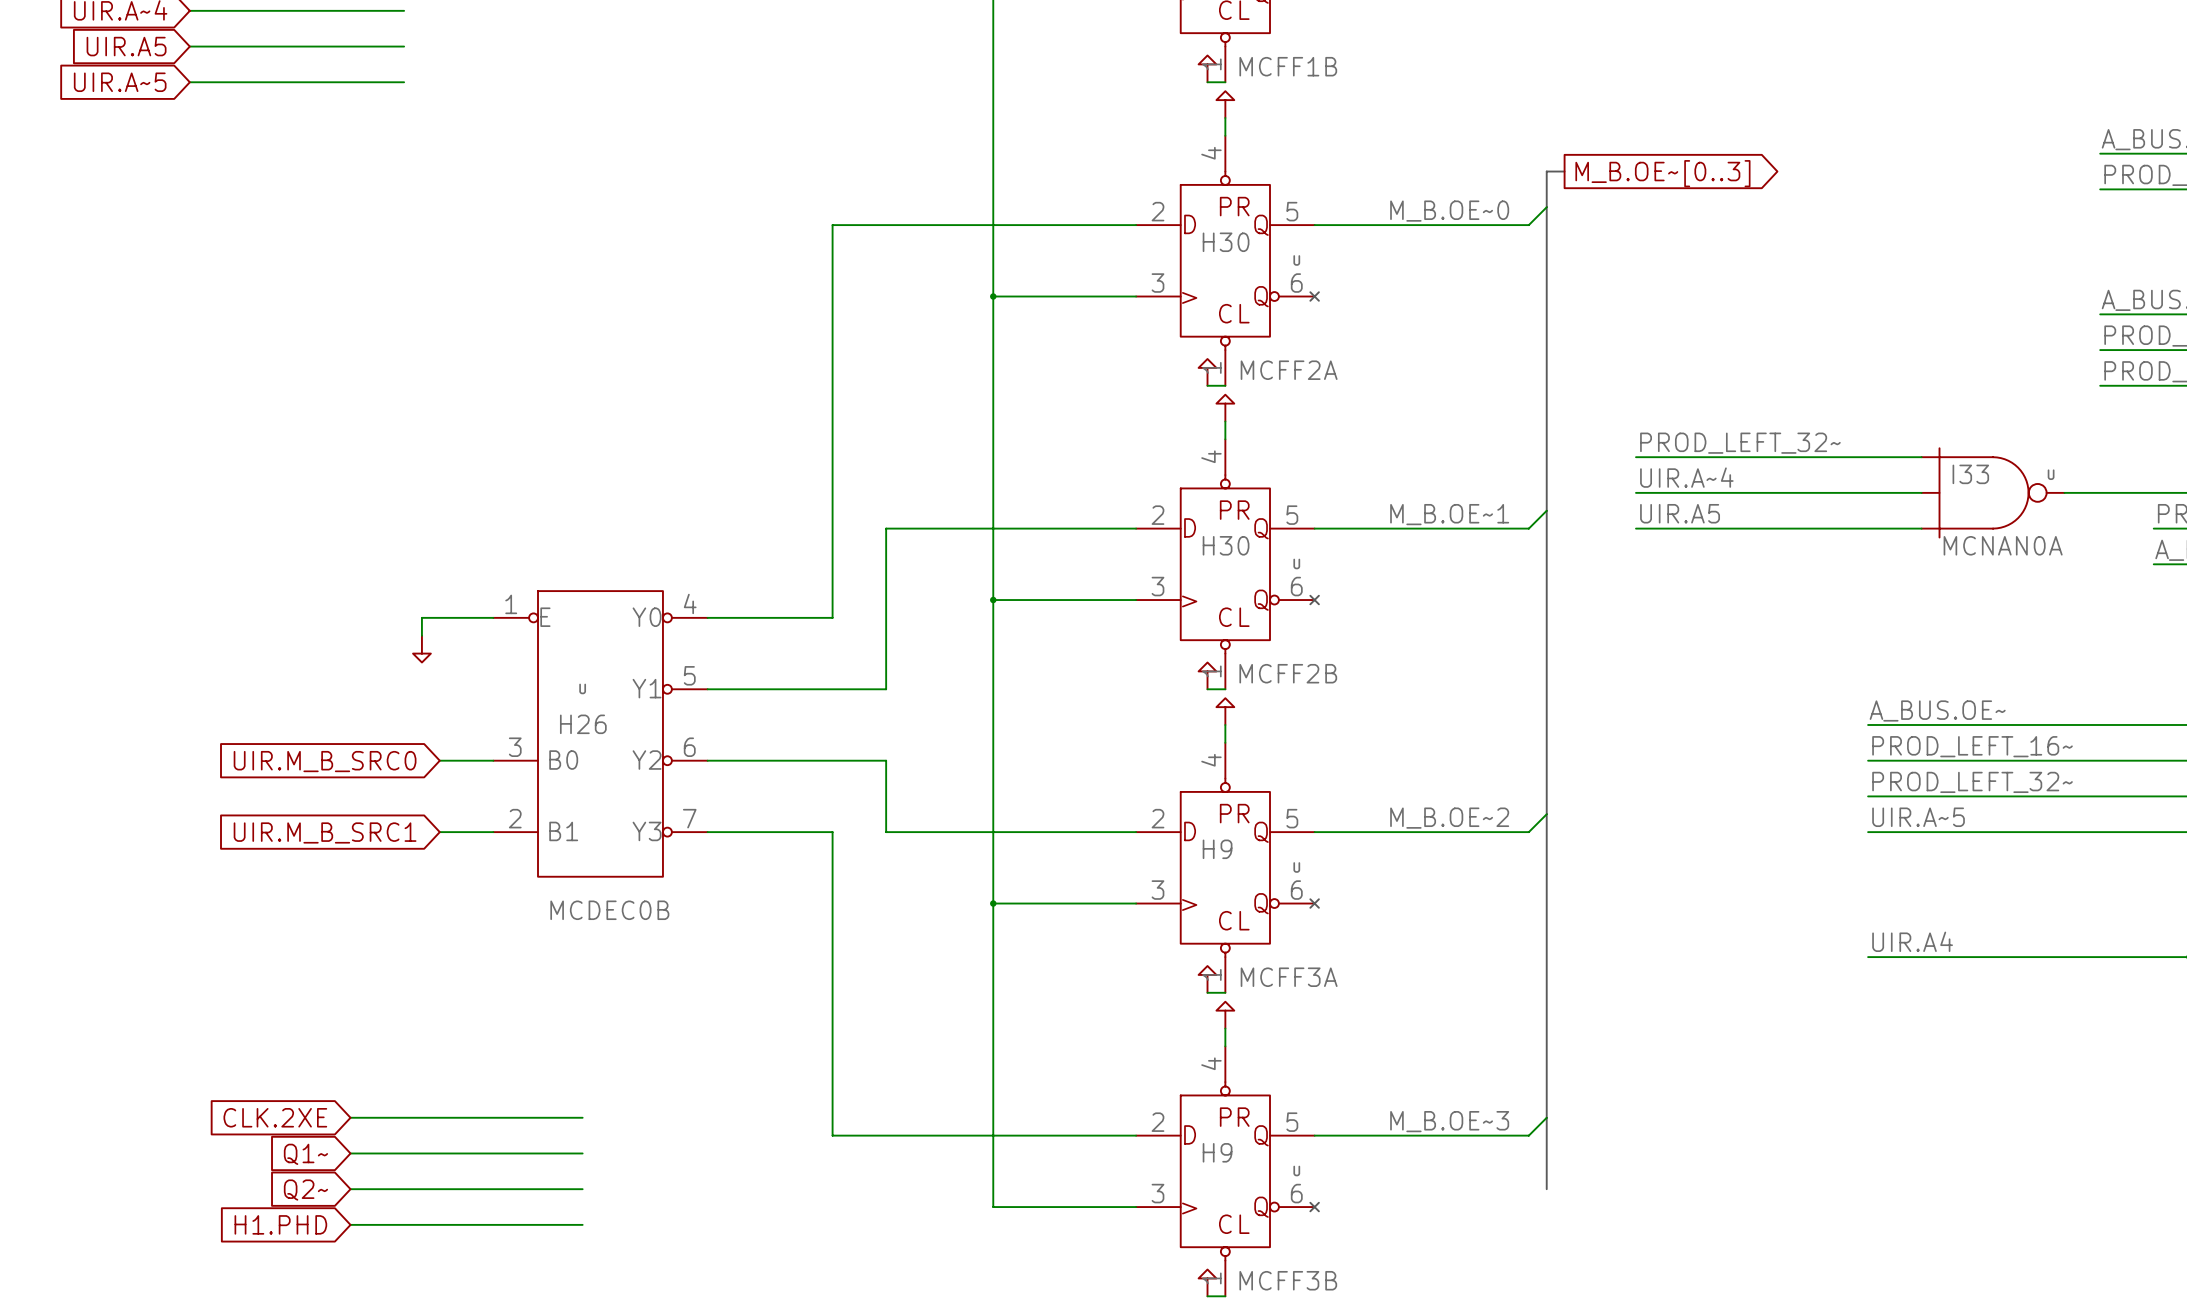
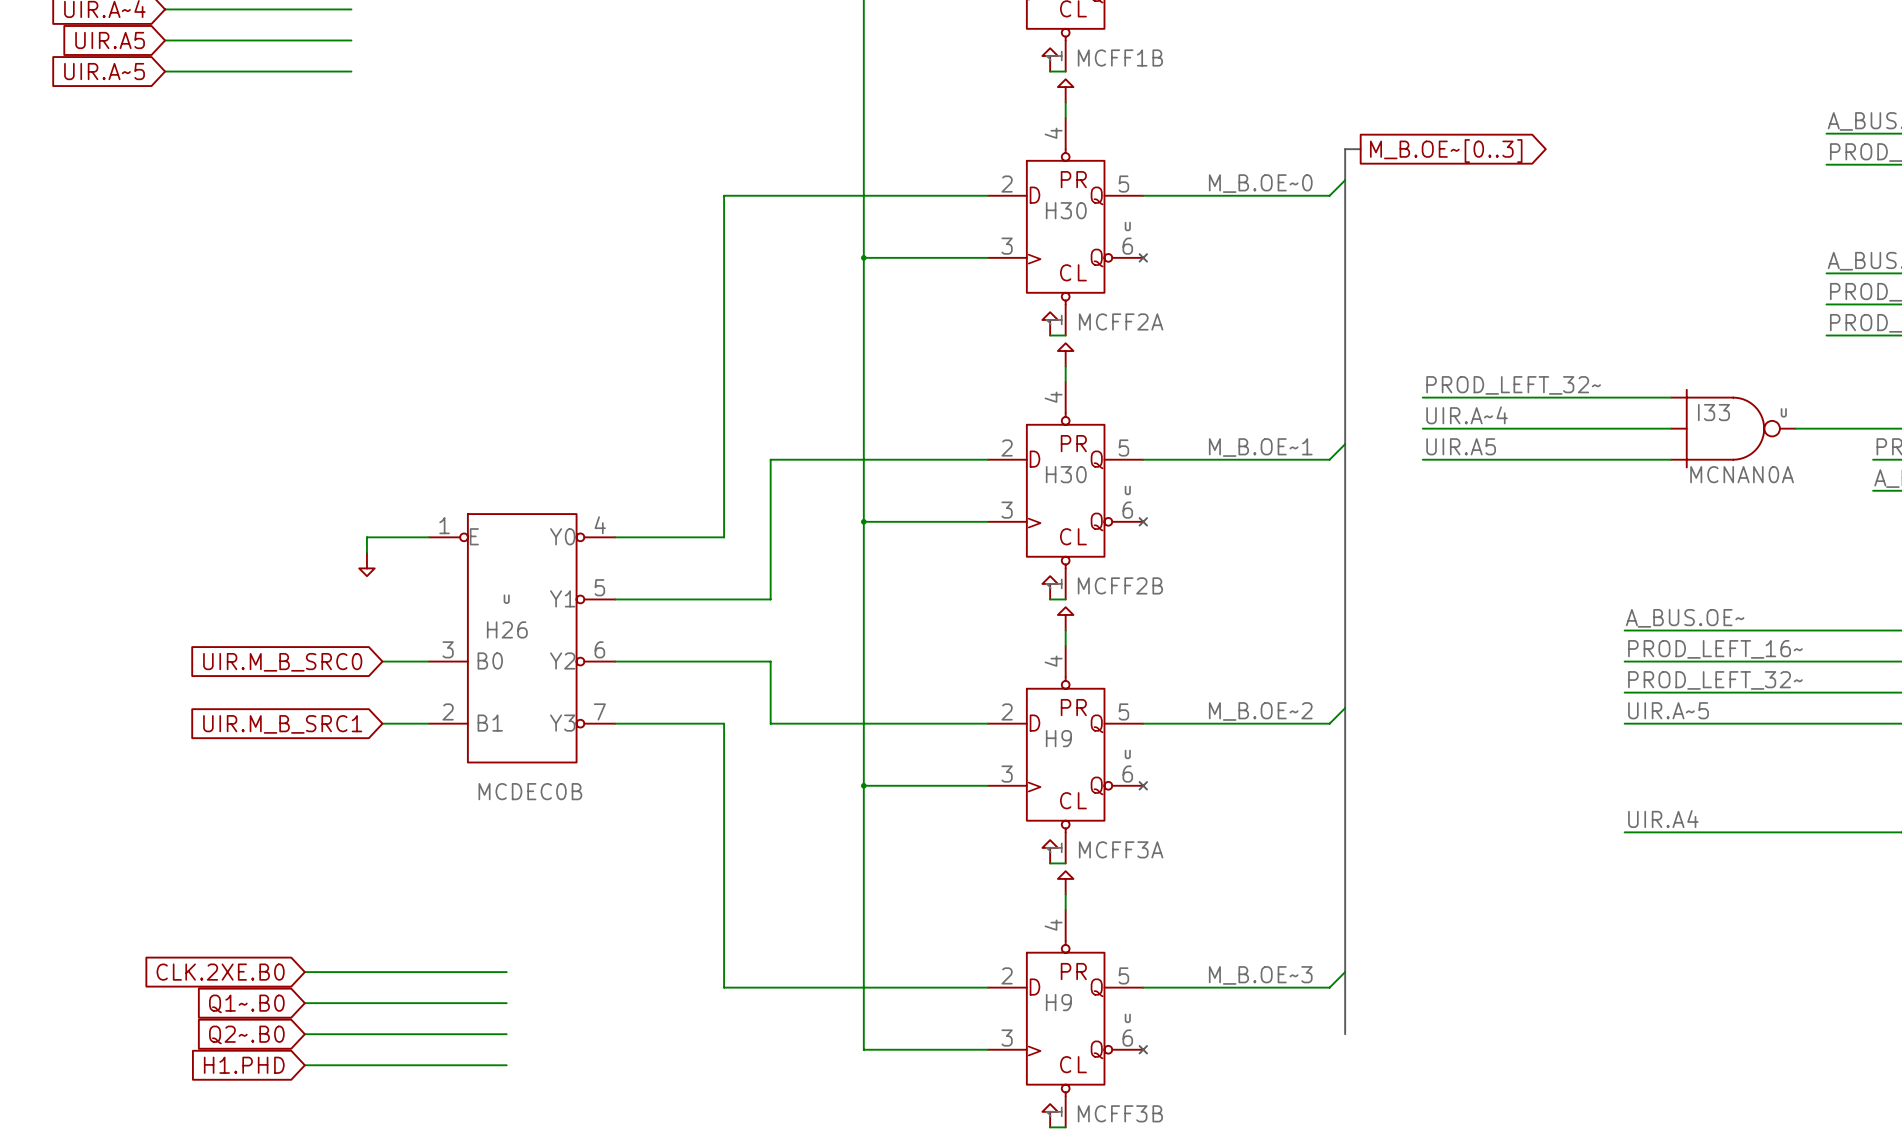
global label: CLK.2XE (275, 1117) -> CLK.2XE.B0 (220, 972)
global label: Q1~ (305, 1154) -> Q1~.B0 (246, 1003)
global label: Q2~ (305, 1190) -> Q2~.B0 (246, 1034)

